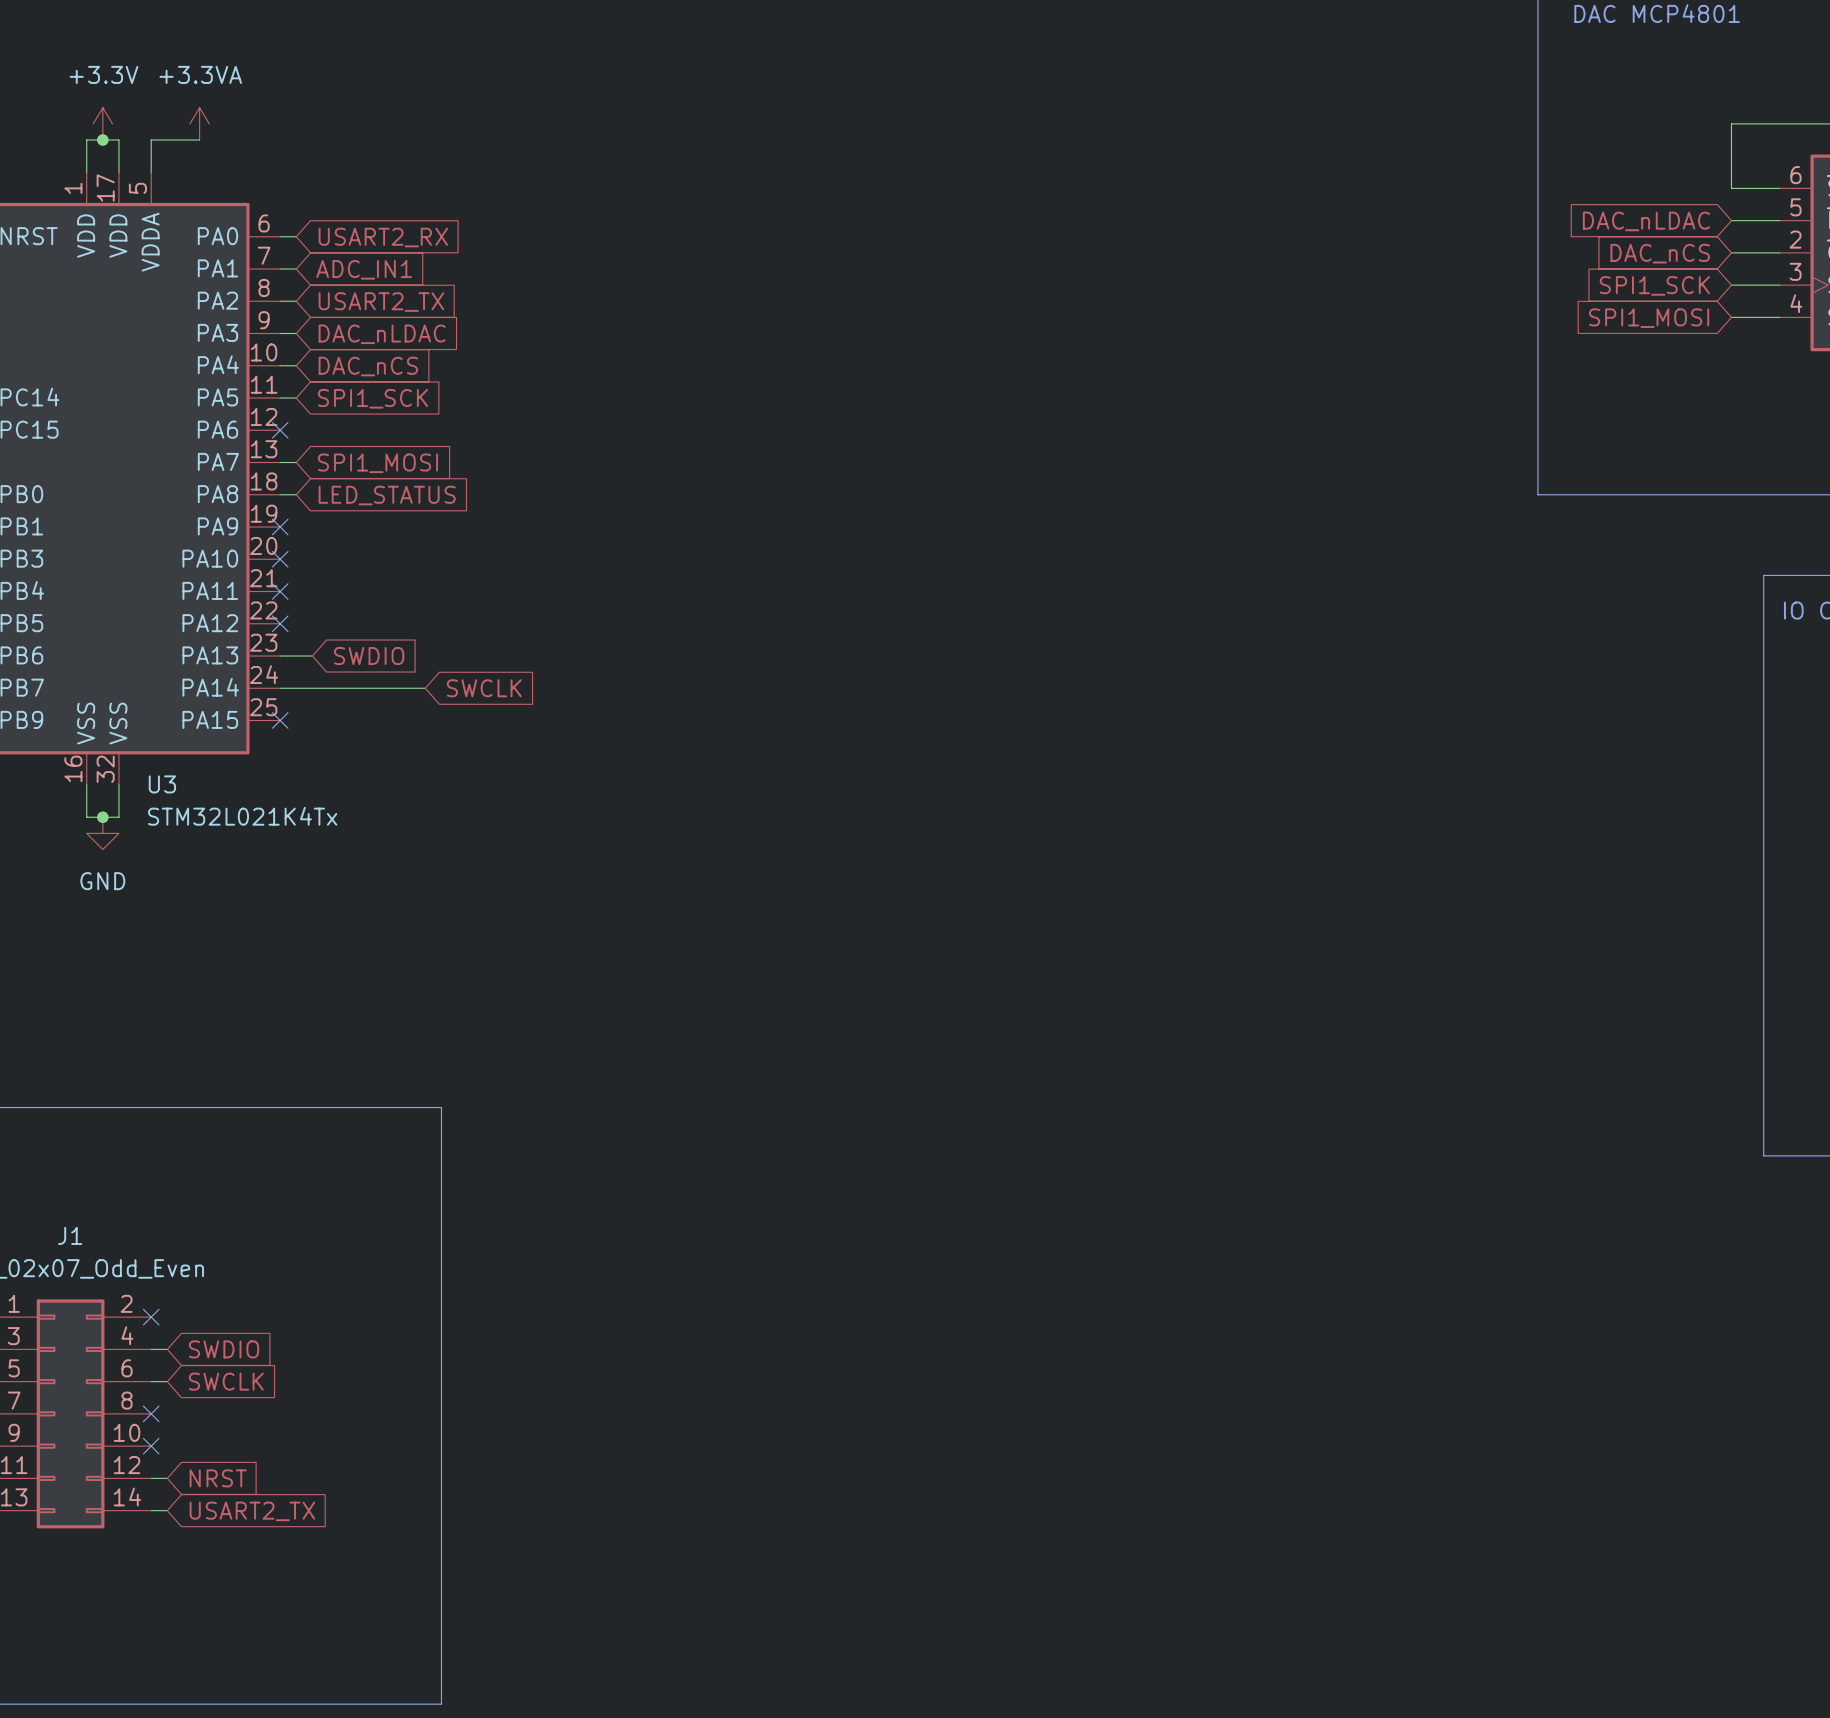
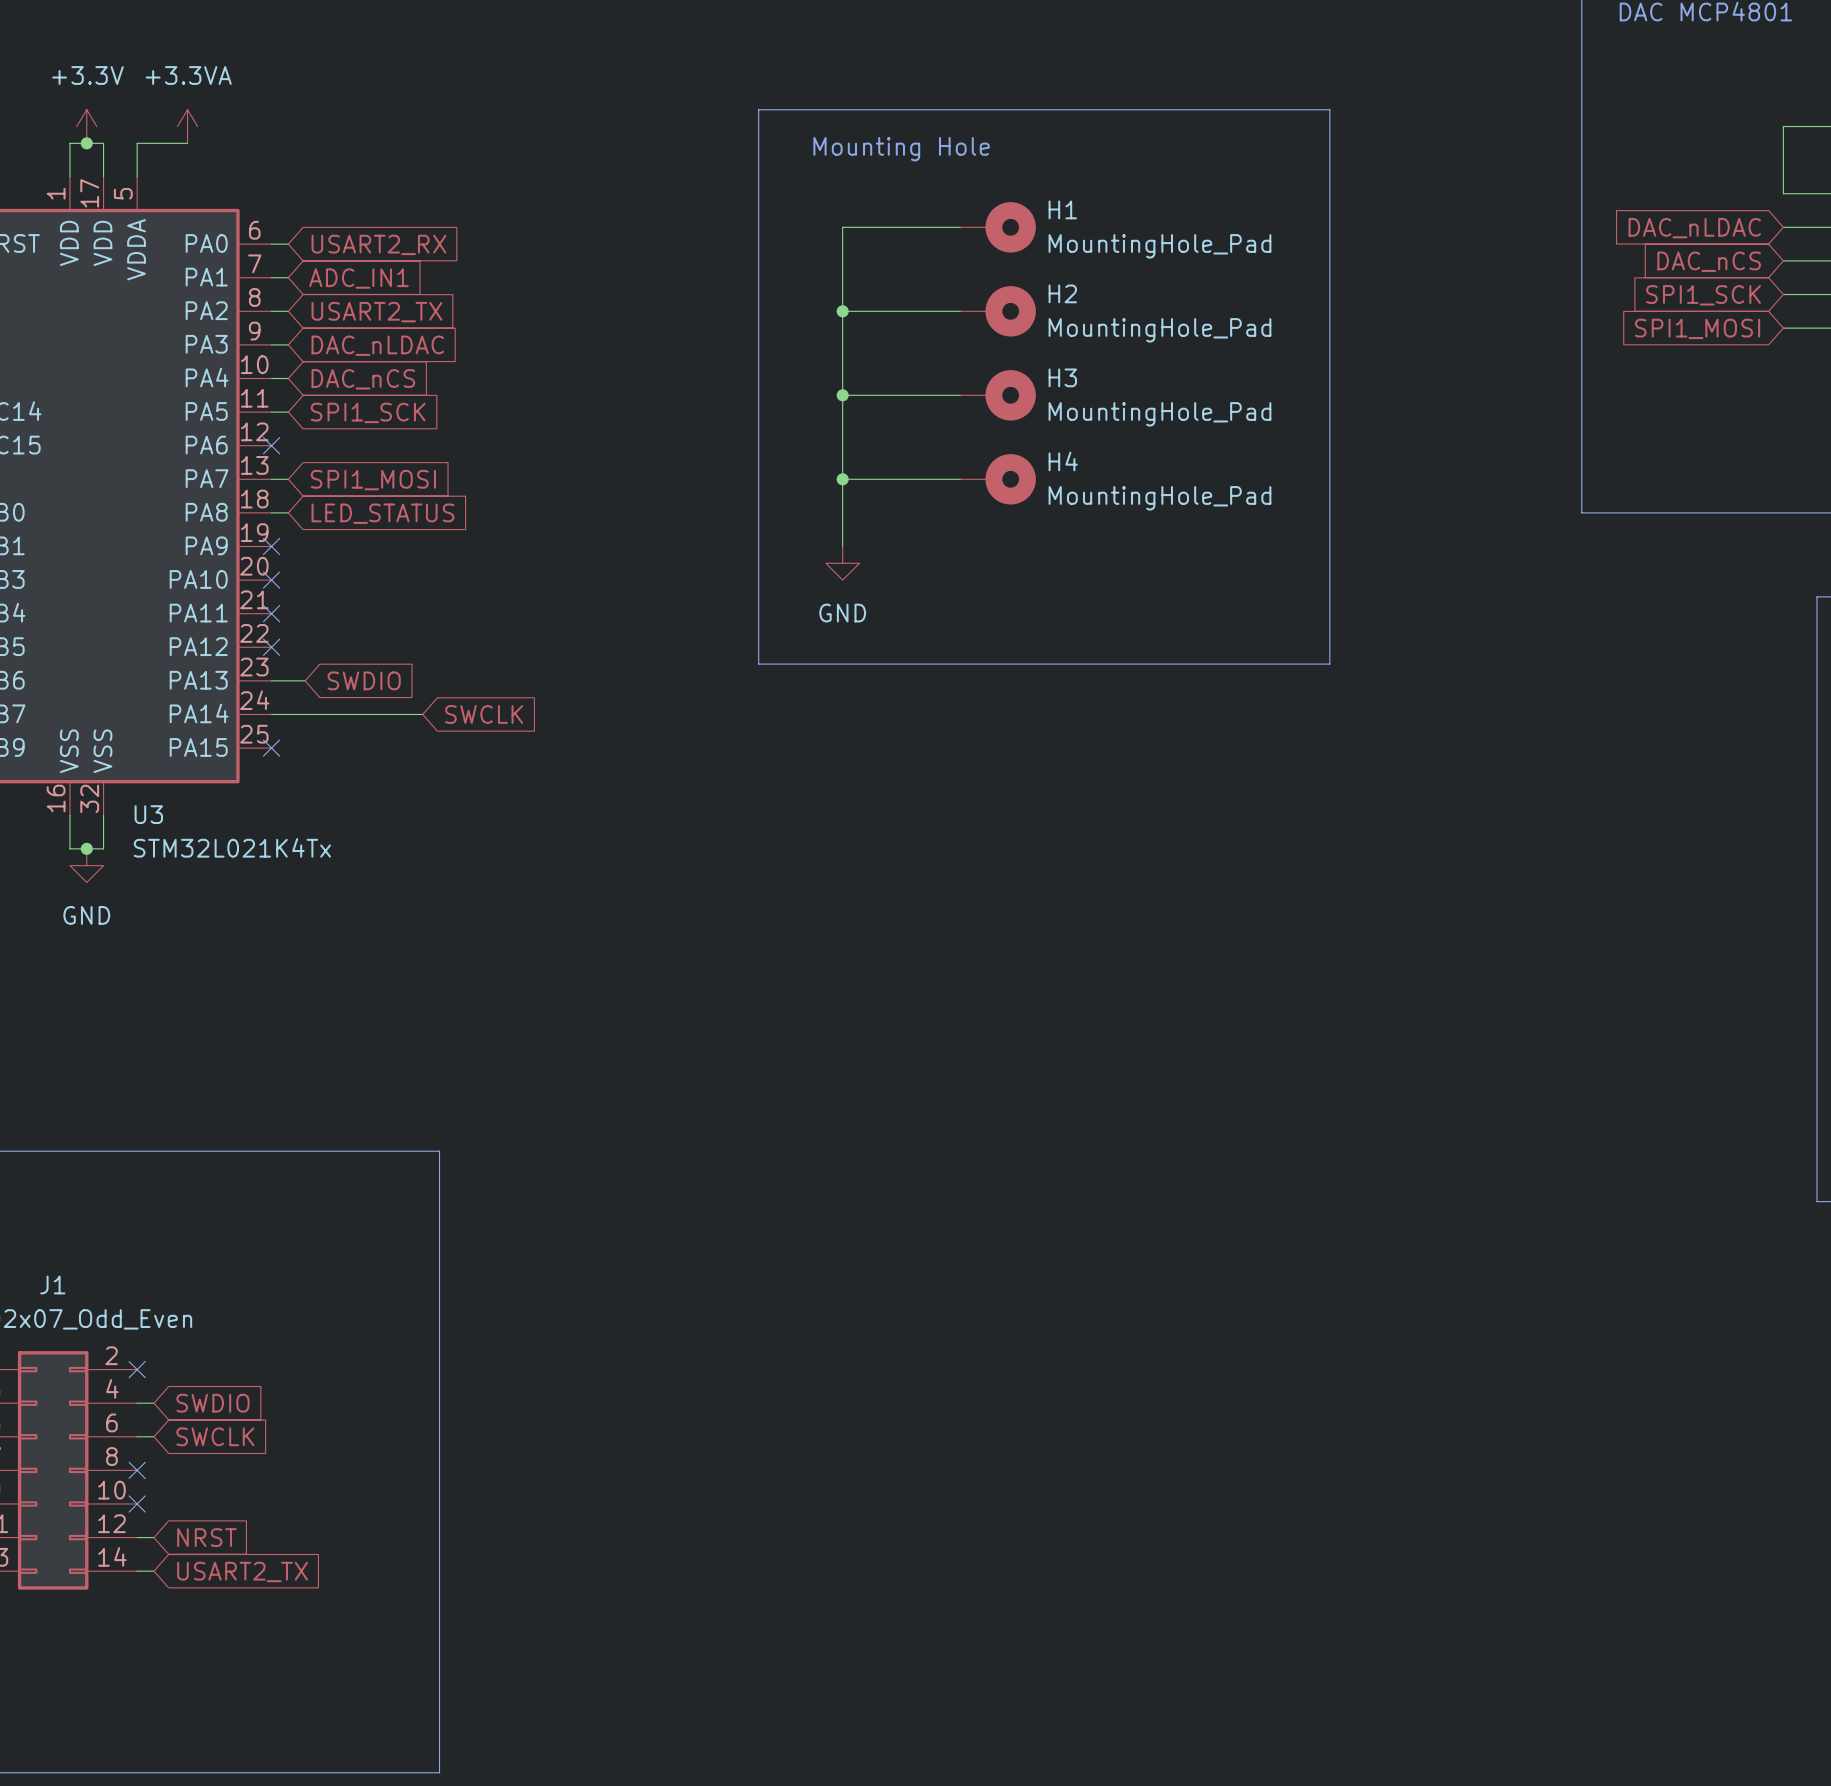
line: none -> (758, 109) (1329, 109) (1329, 664) (758, 664) (758, 109)
text: none -> Mounting Hole (901, 149)
wire: none -> (960, 227) (842, 227) (842, 546)
H1: none -> MountingHole_Pad (998, 227)
wire: none -> (842, 311) (960, 311)
junction: none -> (842, 311)
H2: none -> MountingHole_Pad (998, 311)
wire: none -> (842, 395) (960, 395)
junction: none -> (842, 395)
H3: none -> MountingHole_Pad (998, 395)
wire: none -> (842, 479) (960, 479)
junction: none -> (842, 479)
H4: none -> MountingHole_Pad (998, 479)
power symbol: none -> GND (842, 563)

